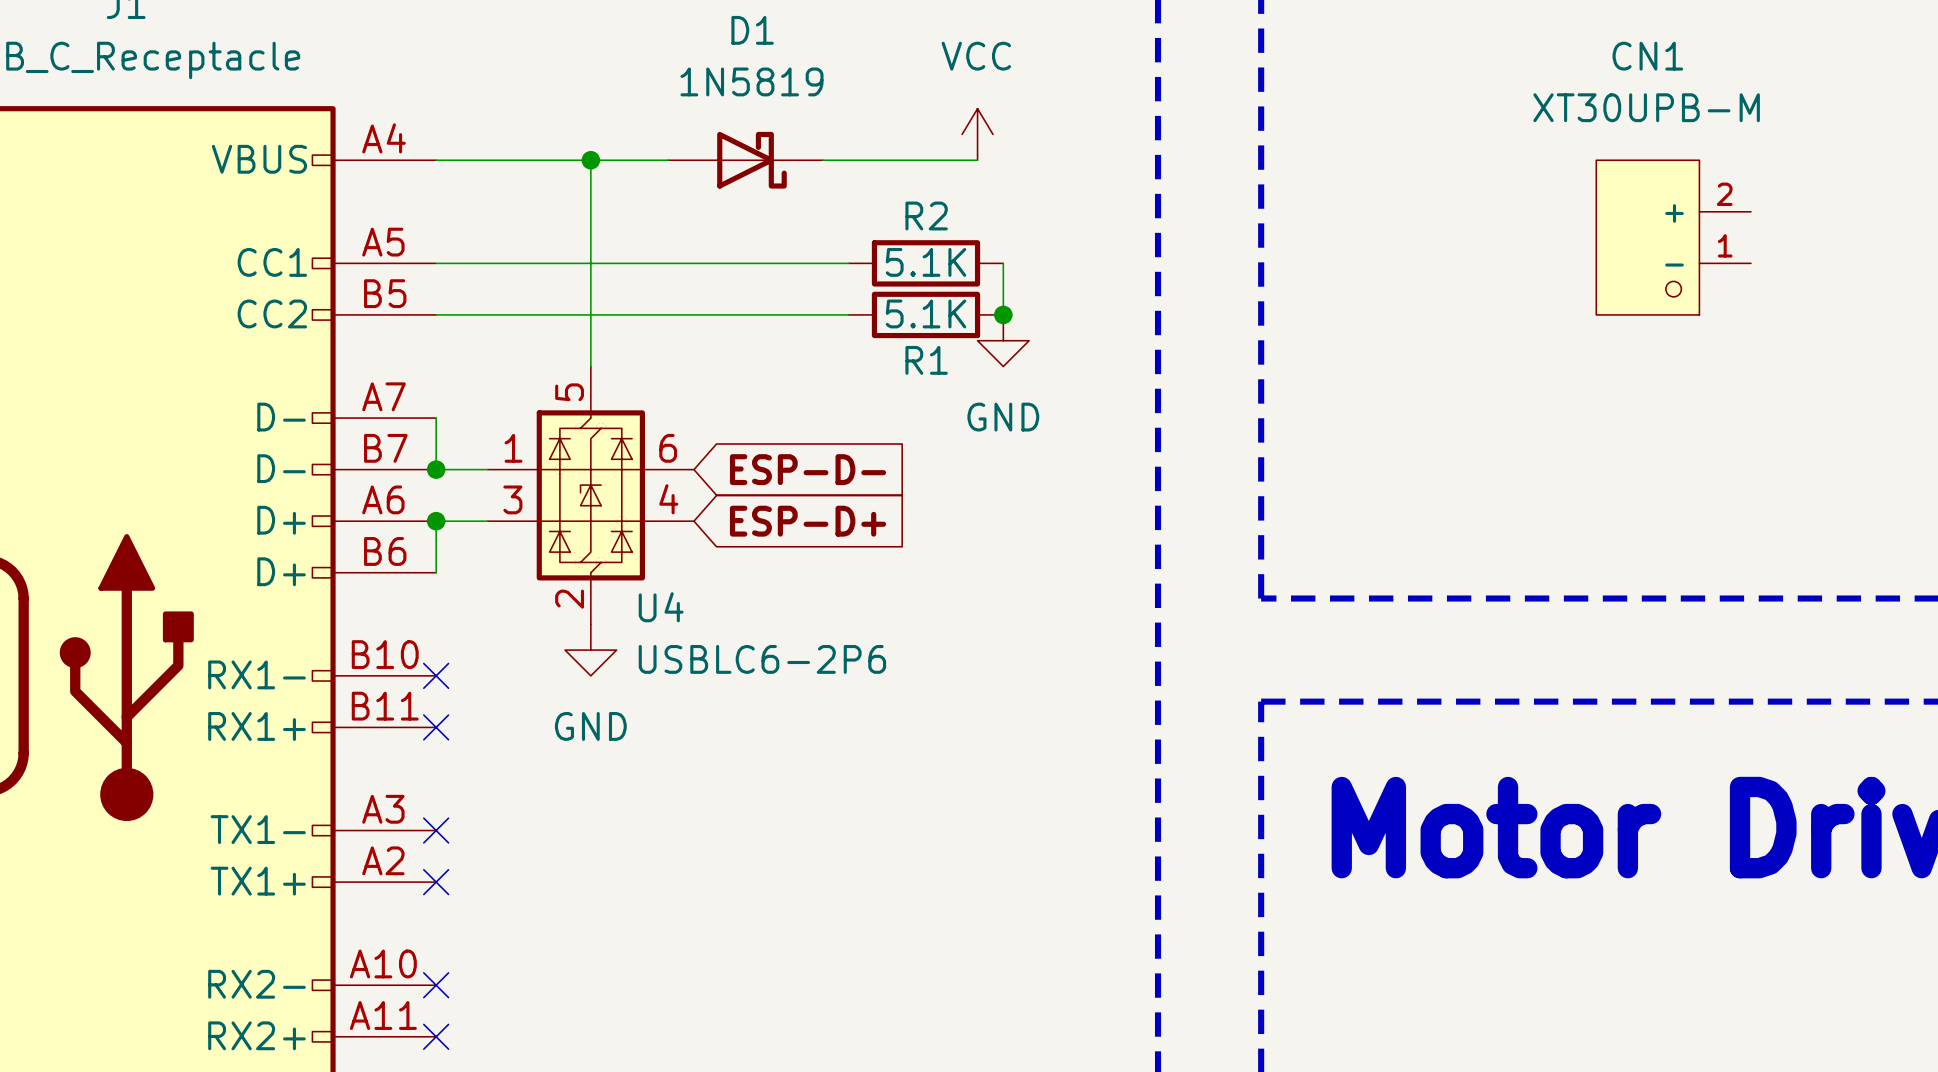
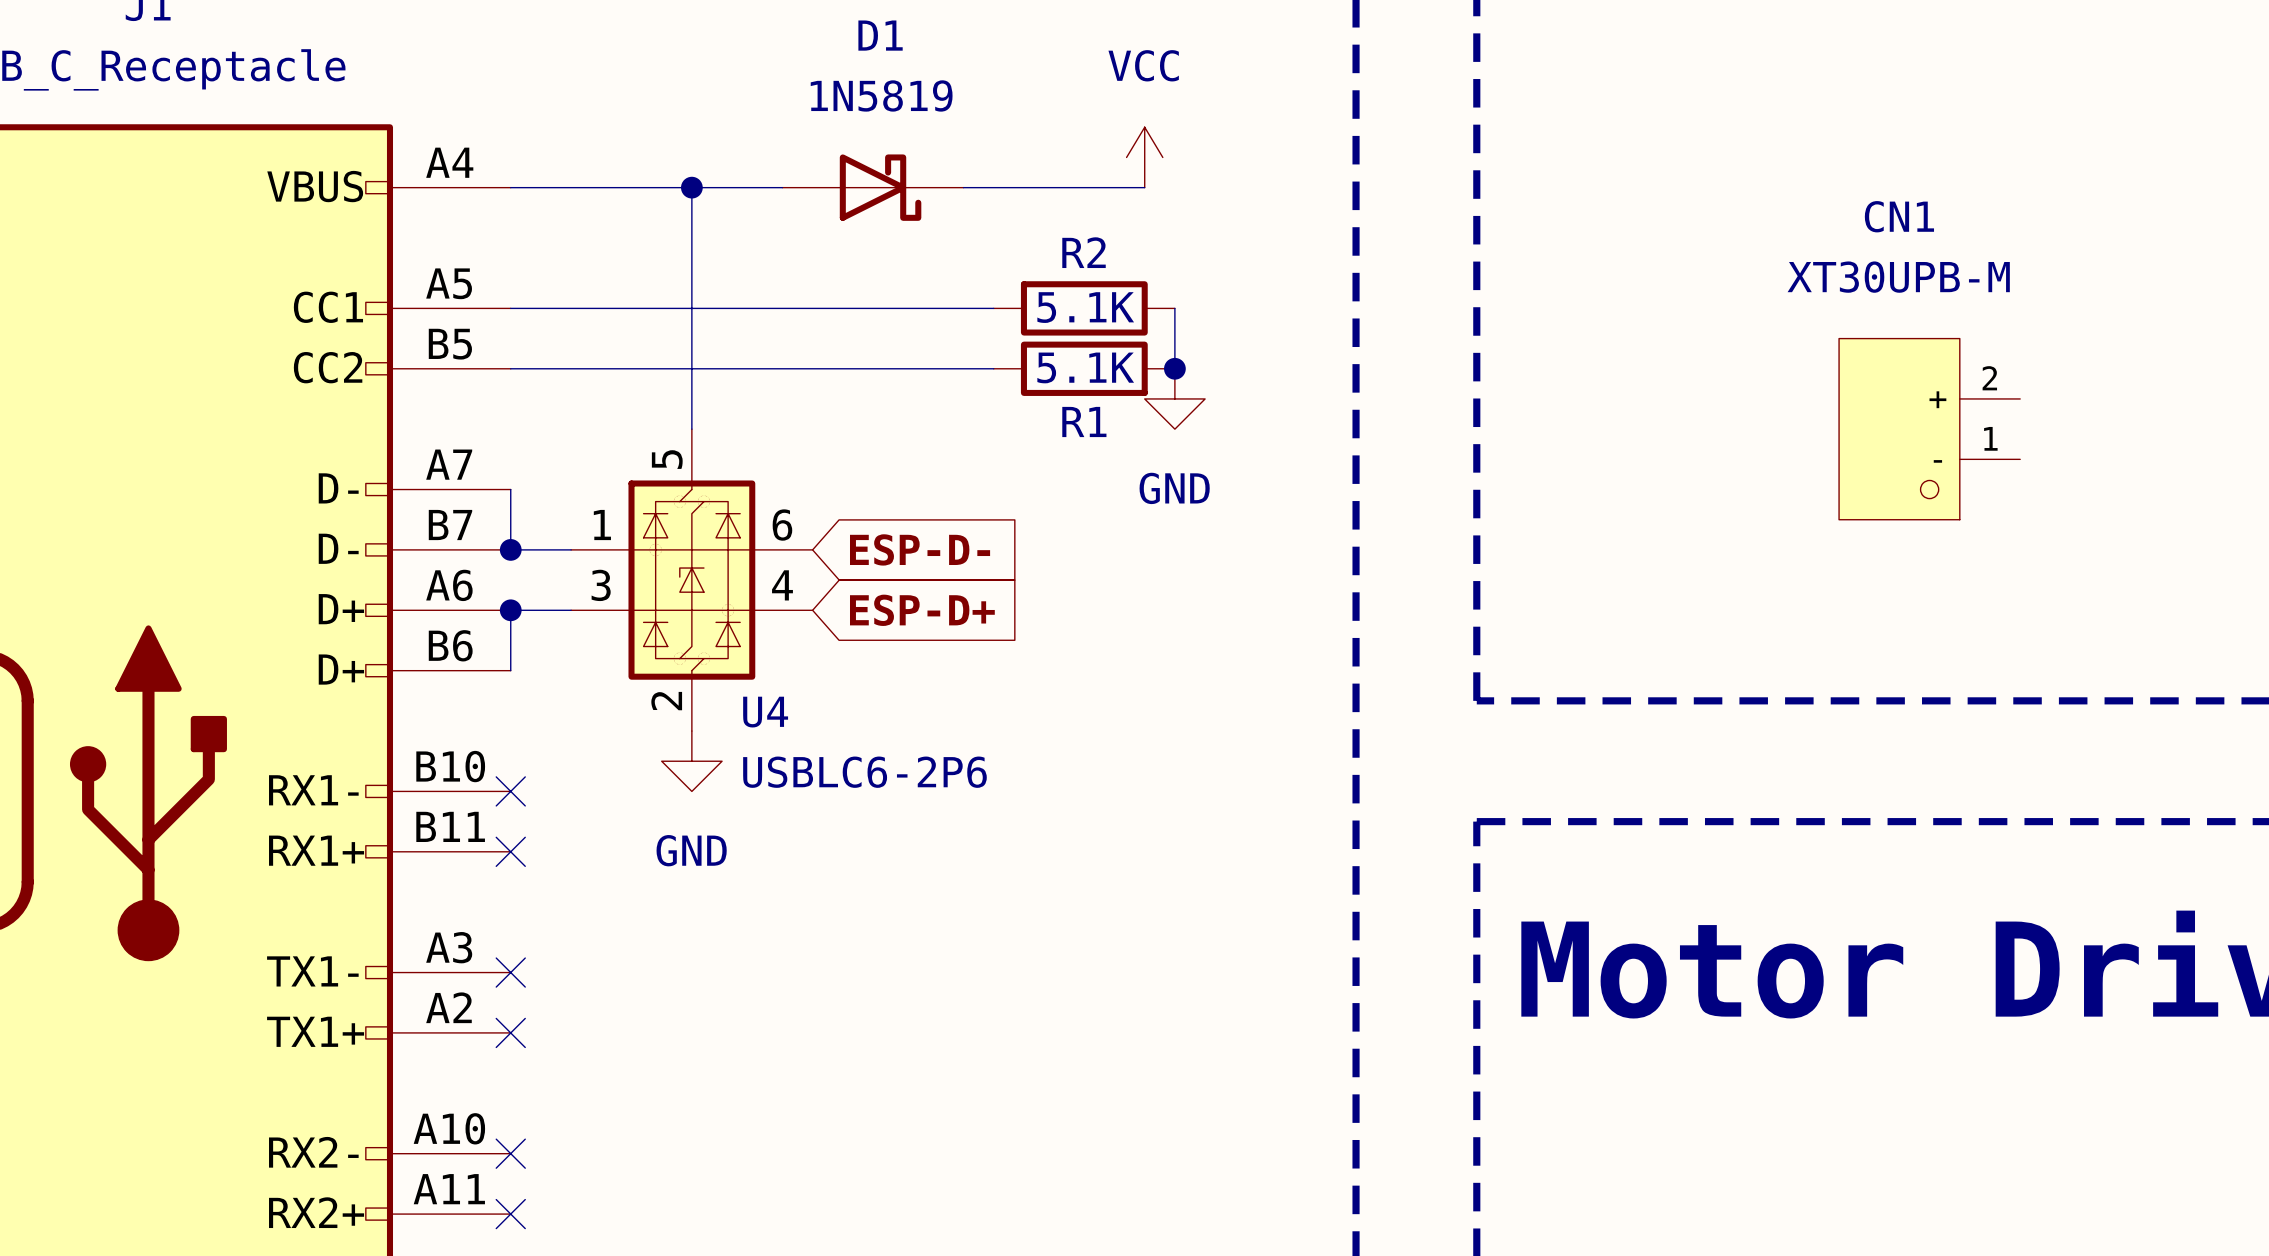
CN1 position: (1673, 237) -> (1929, 429)

